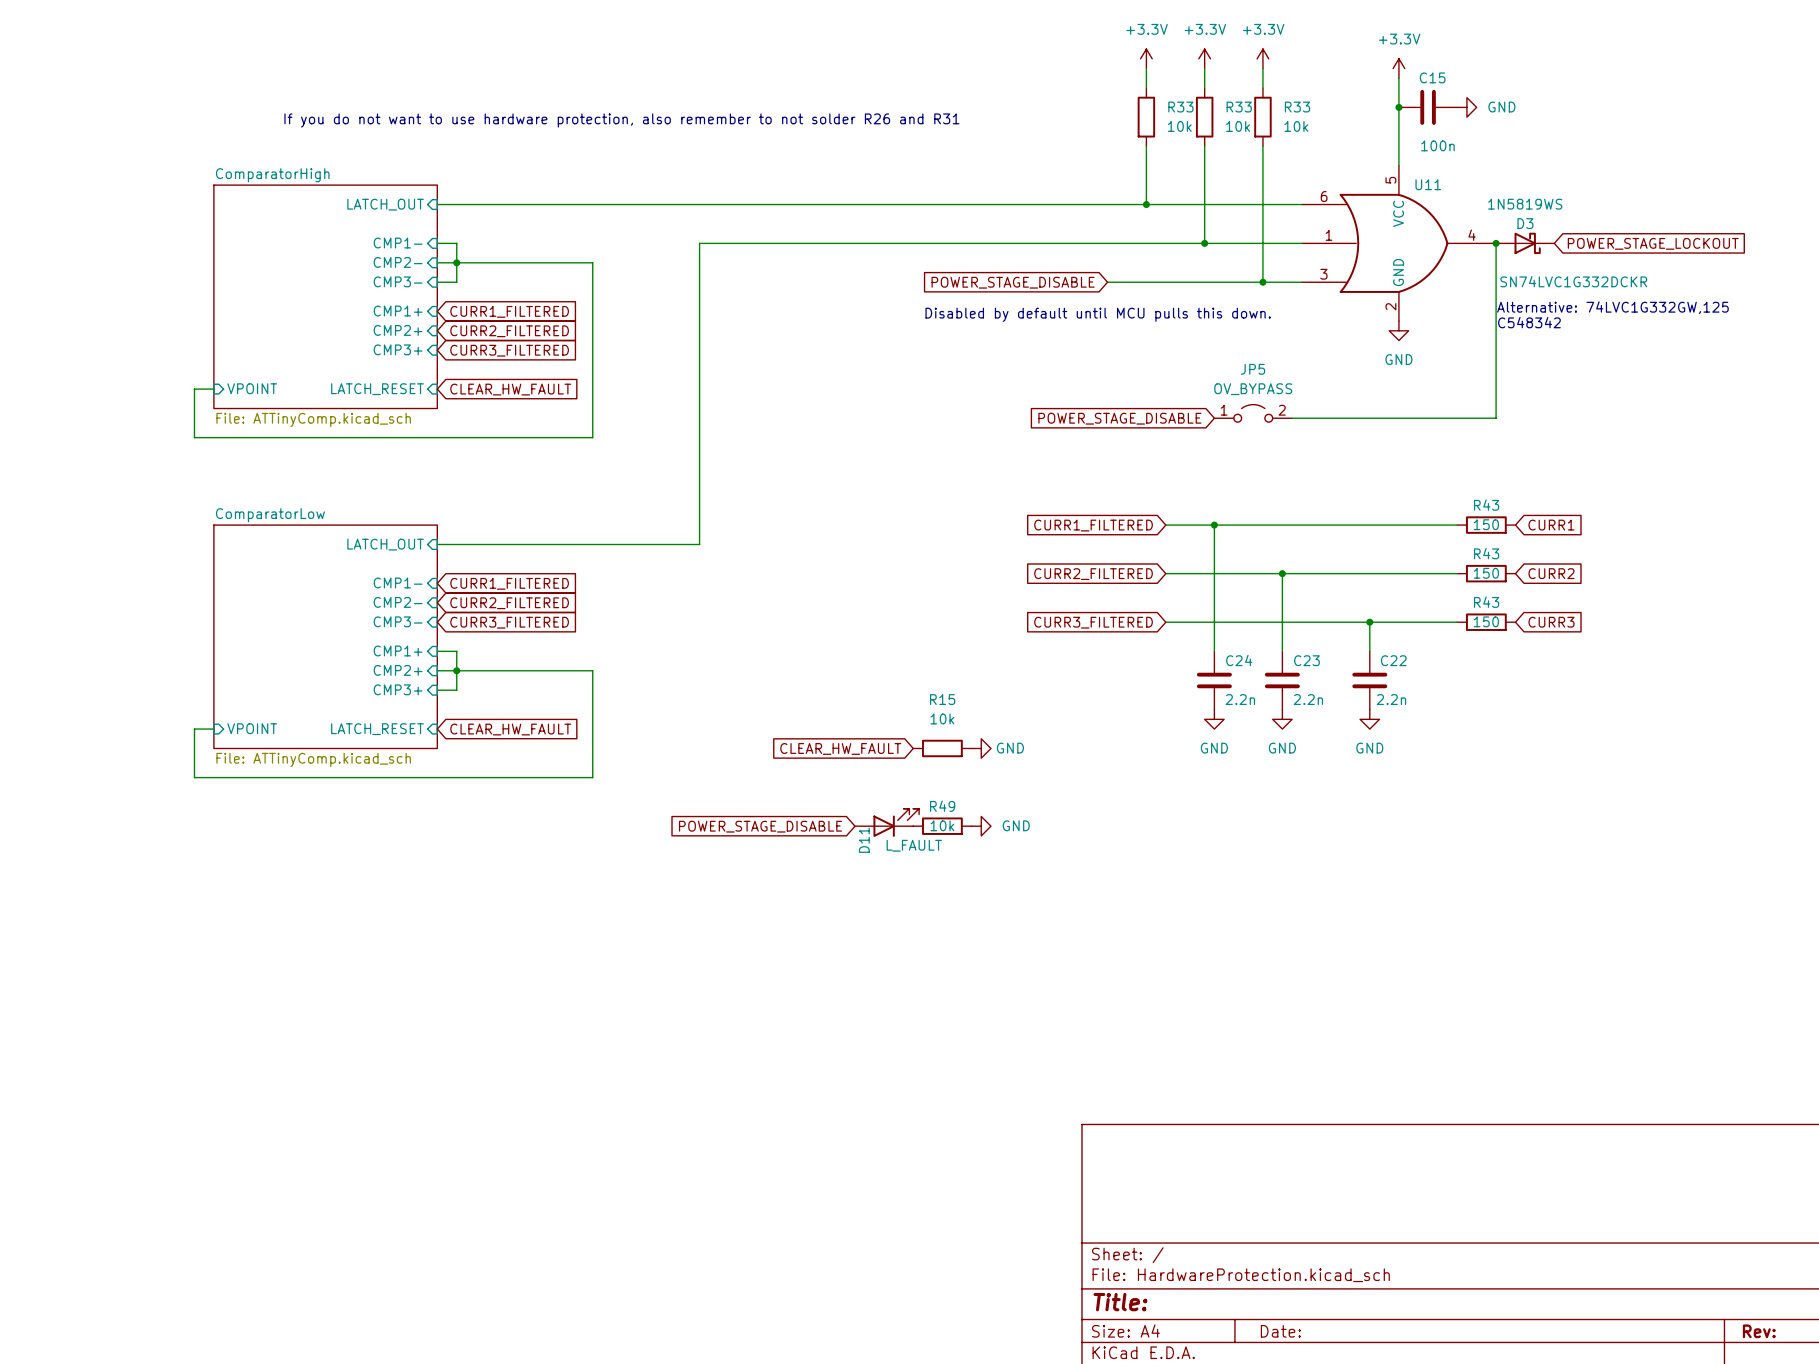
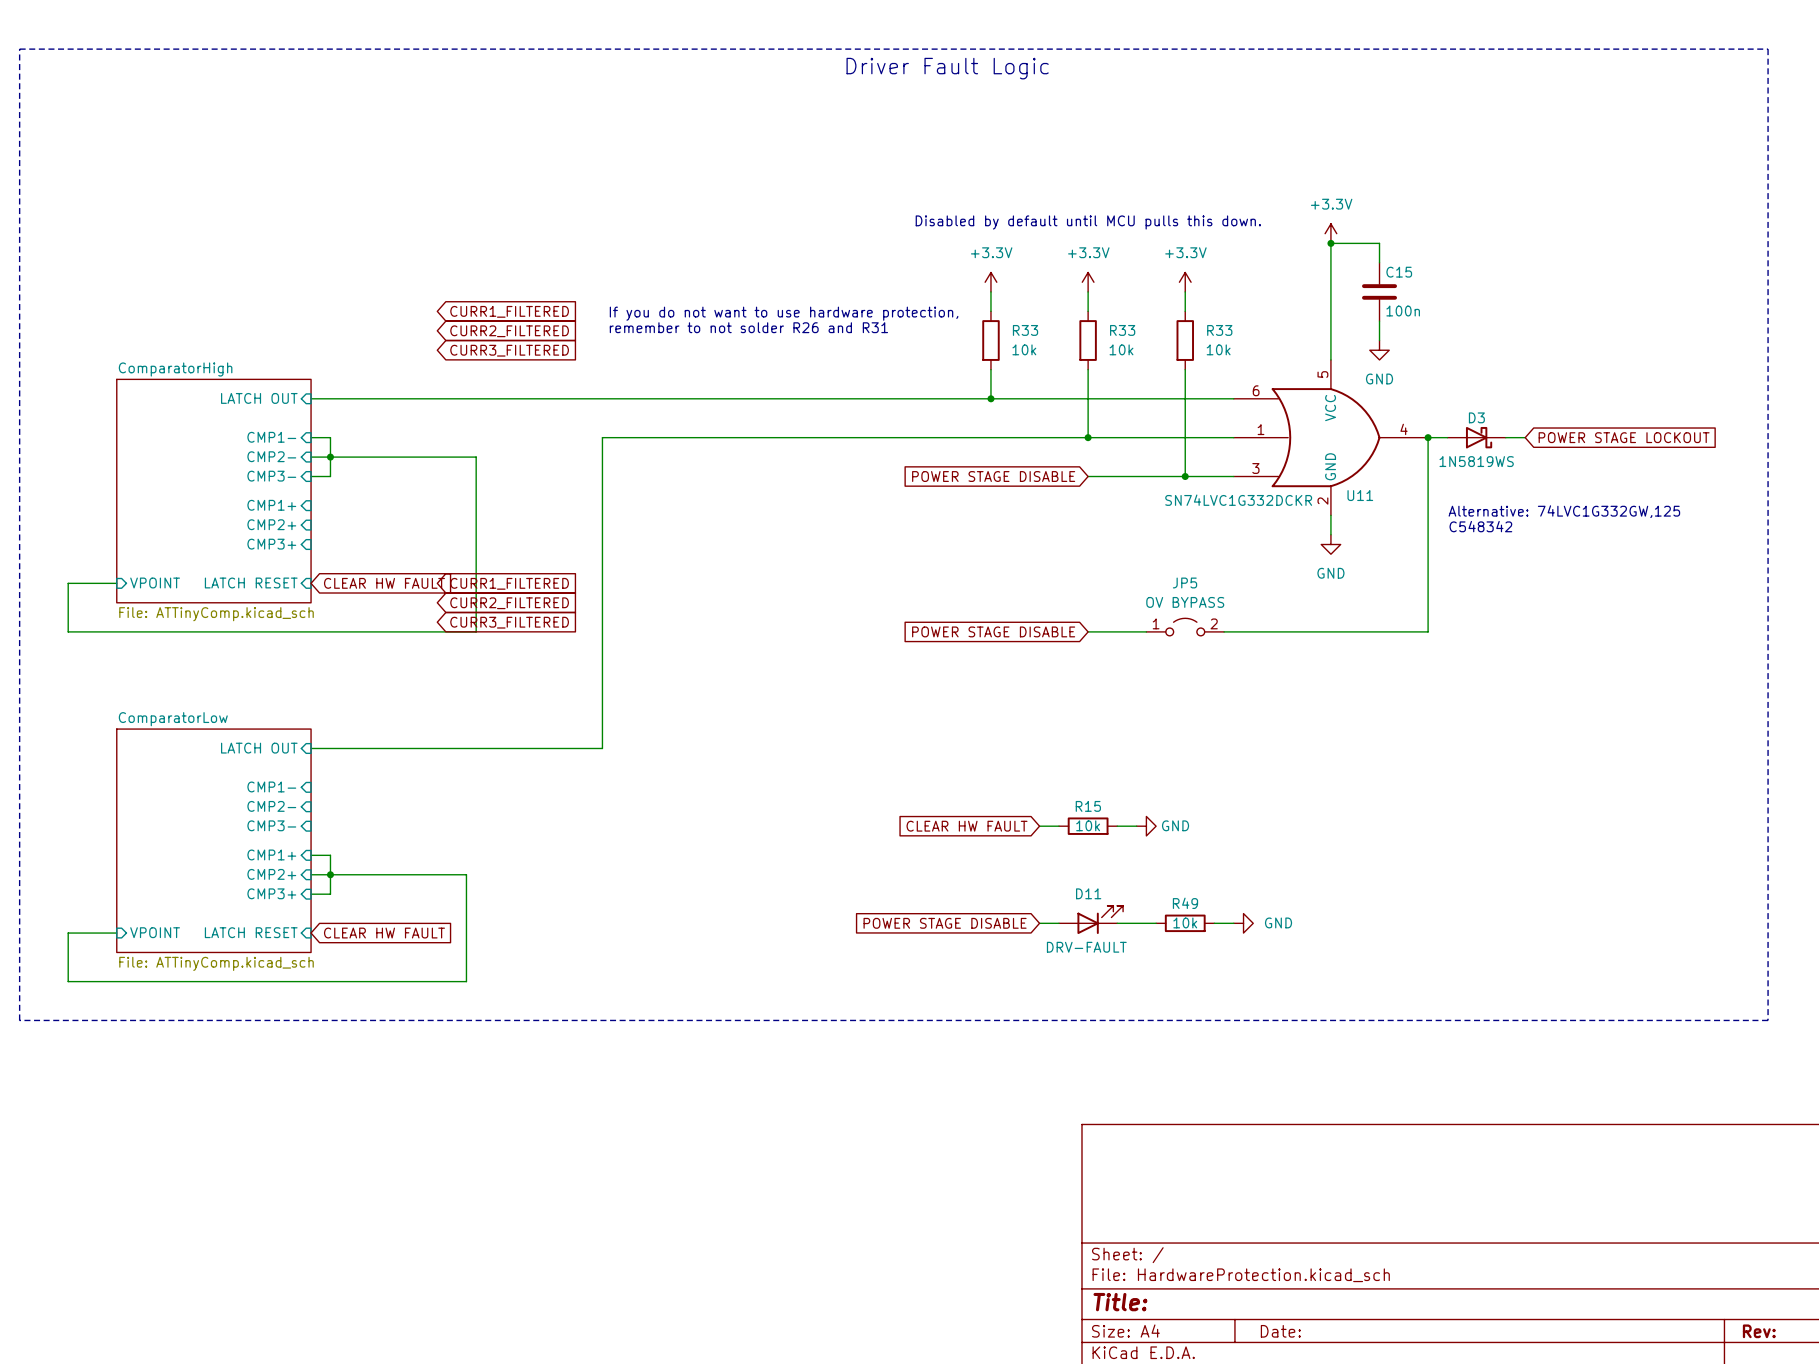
line: none -> (19, 49) (1768, 49) (1768, 1020) (19, 1020) (19, 49)
power symbol: +3.3V (1146, 58) -> none
power symbol: +3.3V (1204, 58) -> none
power symbol: +3.3V (1262, 58) -> none
text: none -> Driver Fault Logic (947, 68)
wire: (1146, 68) (1146, 87) -> none
wire: (1204, 68) (1204, 87) -> none
wire: (1262, 68) (1262, 87) -> none
power symbol: +3.3V (1398, 68) -> none
C15 name position: C15 (1432, 77) -> C15 (1399, 272)
wire: (1398, 78) (1398, 165) -> none
junction: (1398, 107) -> none
C15 rotation: 0° (1428, 107) -> 90° clockwise (1379, 291)
C15 position: (1428, 107) -> (1379, 291)
power symbol: GND (1466, 107) -> none
R33: 10k (1146, 117) -> none
R33: 10k (1204, 117) -> none
R33: 10k (1262, 117) -> none
text: If you do not want to use hardware protection, also remember to not solder R26 and R31 (621, 120) -> none
C15 value position: 100n (1437, 145) -> 100n (1403, 311)
wire: (1146, 146) (1146, 204) -> none
wire: (1204, 146) (1204, 243) -> none
wire: (1262, 146) (1262, 282) -> none
U11 name position: U11 (1428, 184) -> U11 (1360, 495)
sheet pin: LATCH_OUT (385, 204) -> none
wire: (437, 204) (1301, 204) -> none
junction: (1146, 204) -> none
D3 value position: 1N5819WS (1525, 204) -> 1N5819WS (1476, 461)
power symbol: none -> +3.3V (1330, 233)
sheet pin: CMP1- (398, 243) -> none
wire: (437, 243) (456, 243) (456, 282) (437, 282) -> none
junction: (1204, 243) -> none
wire: (1301, 243) (699, 243) (699, 544) (437, 544) -> none
junction: none -> (1330, 243)
U11 position: (1398, 243) -> (1330, 437)
wire: (1496, 243) (1496, 418) (1292, 418) -> none
junction: (1496, 243) -> none
D3 position: (1525, 243) -> (1476, 437)
global label: POWER_STAGE_LOCKOUT (1653, 243) -> none
sheet pin: CMP2- (398, 262) -> none
wire: (437, 262) (592, 262) (592, 437) (330, 437) -> (311, 476) (330, 476) (330, 437)
junction: (456, 262) -> none
wire: none -> (1379, 262) (1379, 243) (1330, 243) (1330, 359)
sheet pin: CMP3- (398, 281) -> none
U11 value position: SN74LVC1G332DCKR (1573, 281) -> SN74LVC1G332DCKR (1238, 500)
power symbol: none -> +3.3V (990, 282)
global label: POWER_STAGE_DISABLE (1013, 282) -> none
power symbol: none -> +3.3V (1088, 282)
wire: (1107, 282) (1301, 282) -> none
power symbol: none -> +3.3V (1185, 282)
junction: (1262, 282) -> none
wire: none -> (990, 291) (990, 311)
wire: none -> (1088, 291) (1088, 311)
wire: none -> (1185, 291) (1185, 311)
sheet ComparatorHigh: File: ATTinyComp.kicad_sch (325, 296) -> none
text: Alternative: 74LVC1G332GW,125 (1612, 307) -> none
sheet pin: CMP1+ (398, 311) -> none
text: none -> If you do not want to use hardware protection, (784, 313)
text position: Disabled by default until MCU pulls this down. (1098, 314) -> Disabled by default until MCU pulls this down. (1088, 222)
wire: none -> (1379, 321) (1379, 340)
text: C548342 (1529, 322) -> none
text: none -> remember to not solder R26 and R31 (748, 327)
sheet pin: CMP2+ (398, 330) -> none
power symbol position: GND (1398, 330) -> GND (1379, 350)
R33: none -> 10k (990, 340)
R33: none -> 10k (1088, 340)
R33: none -> 10k (1185, 340)
sheet pin: CMP3+ (398, 349) -> none
wire: none -> (990, 369) (990, 398)
wire: none -> (1088, 369) (1088, 437)
wire: none -> (1185, 369) (1185, 476)
sheet pin: VPOINT (252, 388) -> none
wire: (213, 389) (194, 389) (194, 437) (311, 437) -> none
sheet pin: LATCH_RESET (377, 389) -> none
global label: CLEAR_HW_FAULT (510, 389) -> none
JP5 value: OV_BYPASS (1253, 389) -> OV BYPASS (1185, 602)
sheet pin: none -> LATCH OUT (259, 398)
wire: none -> (311, 398) (1233, 398)
junction: none -> (990, 398)
JP5 position: (1253, 413) -> (1185, 627)
global label: POWER_STAGE_DISABLE (1119, 418) -> none
sheet pin: none -> CMP1- (271, 437)
junction: none -> (1088, 437)
wire: none -> (1233, 437) (602, 437) (602, 748) (311, 748)
junction: none -> (1428, 437)
wire: none -> (1447, 437) (1428, 437) (1428, 631) (1224, 631)
wire: none -> (1505, 437) (1525, 437)
global label: none -> POWER STAGE LOCKOUT (1624, 437)
sheet pin: none -> CMP2- (271, 456)
wire: none -> (311, 457) (476, 457) (476, 631) (68, 631) (68, 583) (116, 583)
junction: none -> (330, 457)
sheet pin: none -> CMP3- (271, 476)
global label: none -> POWER STAGE DISABLE (993, 476)
wire: none -> (1088, 476) (1233, 476)
junction: none -> (1185, 476)
sheet ComparatorHigh: none -> File: ATTinyComp.kicad_sch (213, 491)
sheet pin: none -> CMP1+ (271, 505)
text: none -> Alternative: 74LVC1G332GW,125 (1564, 511)
wire: none -> (1330, 515) (1330, 534)
sheet pin: none -> CMP2+ (271, 524)
global label: CURR1_FILTERED (1093, 525) -> none
wire: (1165, 525) (1457, 525) -> none
wire: (1214, 525) (1214, 651) -> none
junction: (1214, 525) -> none
R43: 150 (1486, 525) -> none
global label: CURR1 (1551, 525) -> none
text: none -> C548342 (1480, 526)
sheet pin: none -> CMP3+ (271, 544)
sheet pin: LATCH_OUT (385, 544) -> none
power symbol: none -> GND (1330, 544)
wire: (1165, 573) (1457, 573) -> none
wire: (1282, 573) (1282, 651) -> none
junction: (1282, 573) -> none
R43: 150 (1486, 573) -> none
global label: CURR2 (1551, 573) -> none
global label: CURR2_FILTERED (1093, 574) -> none
sheet pin: none -> VPOINT (155, 582)
sheet pin: none -> LATCH RESET (251, 582)
sheet pin: CMP1- (398, 582) -> none
global label: none -> CLEAR HW FAULT (384, 583)
sheet pin: CMP2- (398, 602) -> none
sheet pin: CMP3- (398, 621) -> none
global label: CURR3_FILTERED (1093, 622) -> none
wire: (1165, 622) (1457, 622) -> none
wire: (1369, 622) (1369, 651) -> none
junction: (1369, 622) -> none
R43: 150 (1486, 622) -> none
global label: CURR3 (1551, 622) -> none
global label: none -> POWER STAGE DISABLE (993, 631)
sheet ComparatorLow: File: ATTinyComp.kicad_sch (325, 636) -> none
sheet pin: CMP1+ (398, 650) -> none
wire: (437, 651) (456, 651) (456, 690) (437, 690) -> none
sheet pin: CMP2+ (398, 670) -> none
wire: (437, 670) (592, 670) (592, 777) (194, 777) (194, 729) (213, 729) -> none
junction: (456, 670) -> none
C24: 2.2n (1214, 680) -> none
C23: 2.2n (1282, 680) -> none
C22: 2.2n (1369, 680) -> none
sheet pin: CMP3+ (398, 689) -> none
R15 name position: R15 (942, 699) -> R15 (1088, 806)
R15 value position: 10k (942, 718) -> 10k (1088, 825)
power symbol: GND (1214, 719) -> none
power symbol: GND (1282, 719) -> none
power symbol: GND (1369, 719) -> none
sheet pin: VPOINT (252, 728) -> none
sheet pin: LATCH_RESET (377, 729) -> none
global label: CLEAR_HW_FAULT (510, 729) -> none
sheet pin: none -> LATCH OUT (259, 748)
global label: CLEAR_HW_FAULT (840, 748) -> none
R15 position: (942, 748) -> (1088, 826)
power symbol: GND (981, 748) -> none
sheet pin: none -> CMP1- (271, 786)
sheet pin: none -> CMP2- (271, 806)
D11 position: (887, 822) -> (1091, 919)
sheet pin: none -> CMP3- (271, 825)
global label: POWER_STAGE_DISABLE (760, 826) -> none
R49 position: (942, 826) -> (1185, 923)
global label: none -> CLEAR HW FAULT (967, 826)
power symbol: GND (981, 826) -> none
wire: none -> (1039, 826) (1058, 826)
wire: none -> (1117, 826) (1136, 826)
power symbol: none -> GND (1146, 826)
sheet ComparatorLow: none -> File: ATTinyComp.kicad_sch (213, 840)
D11 name rotation: 0° (864, 840) -> 90° clockwise (1088, 893)
D11 name position: D11 (864, 840) -> D11 (1088, 893)
D11 value: L_FAULT (914, 845) -> DRV-FAULT (1086, 947)
sheet pin: none -> CMP1+ (271, 854)
wire: none -> (311, 855) (330, 855) (330, 894) (311, 894)
sheet pin: none -> CMP2+ (271, 874)
wire: none -> (311, 874) (466, 874) (466, 981) (68, 981) (68, 933) (116, 933)
junction: none -> (330, 874)
sheet pin: none -> CMP3+ (271, 893)
global label: none -> POWER STAGE DISABLE (945, 923)
wire: none -> (1039, 923) (1058, 923)
wire: none -> (1117, 923) (1156, 923)
wire: none -> (1214, 923) (1233, 923)
power symbol: none -> GND (1243, 923)
sheet pin: none -> VPOINT (155, 932)
sheet pin: none -> LATCH RESET (251, 932)
global label: none -> CLEAR HW FAULT (384, 933)

